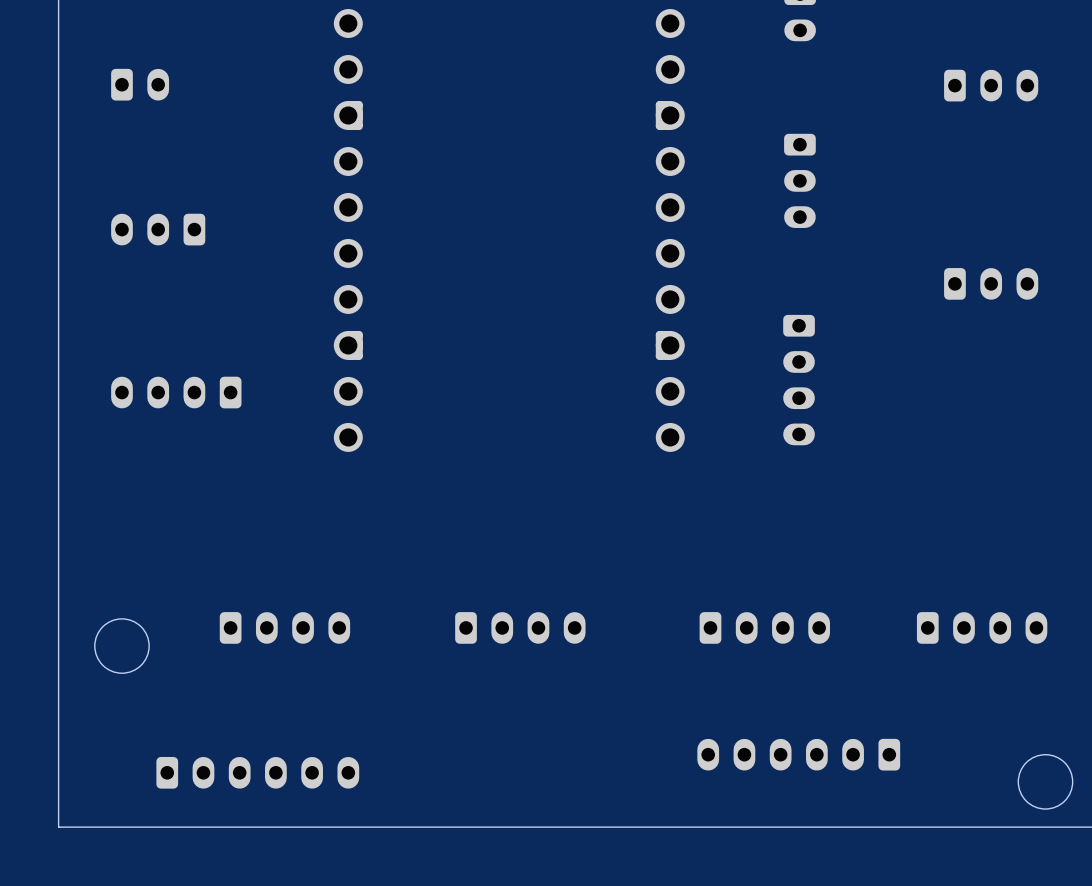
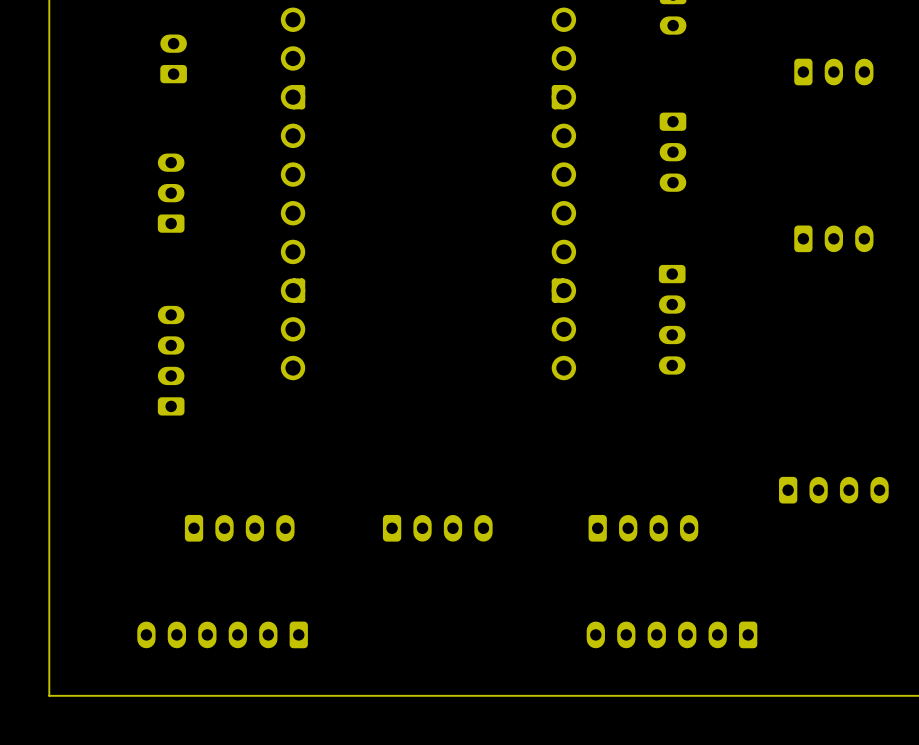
part rotation: 0° (140, 84) -> 90° counterclockwise (173, 58)
part position: (140, 84) -> (173, 58)
part rotation: 0° (158, 229) -> 90° clockwise (171, 193)
part rotation: 0° (176, 392) -> 90° clockwise (171, 360)
round board edge: [94, 618, 150, 674] -> none
part position: (982, 627) -> (833, 490)
round board edge: [1017, 754, 1074, 810] -> none
part rotation: 0° (257, 772) -> 180° (222, 634)

